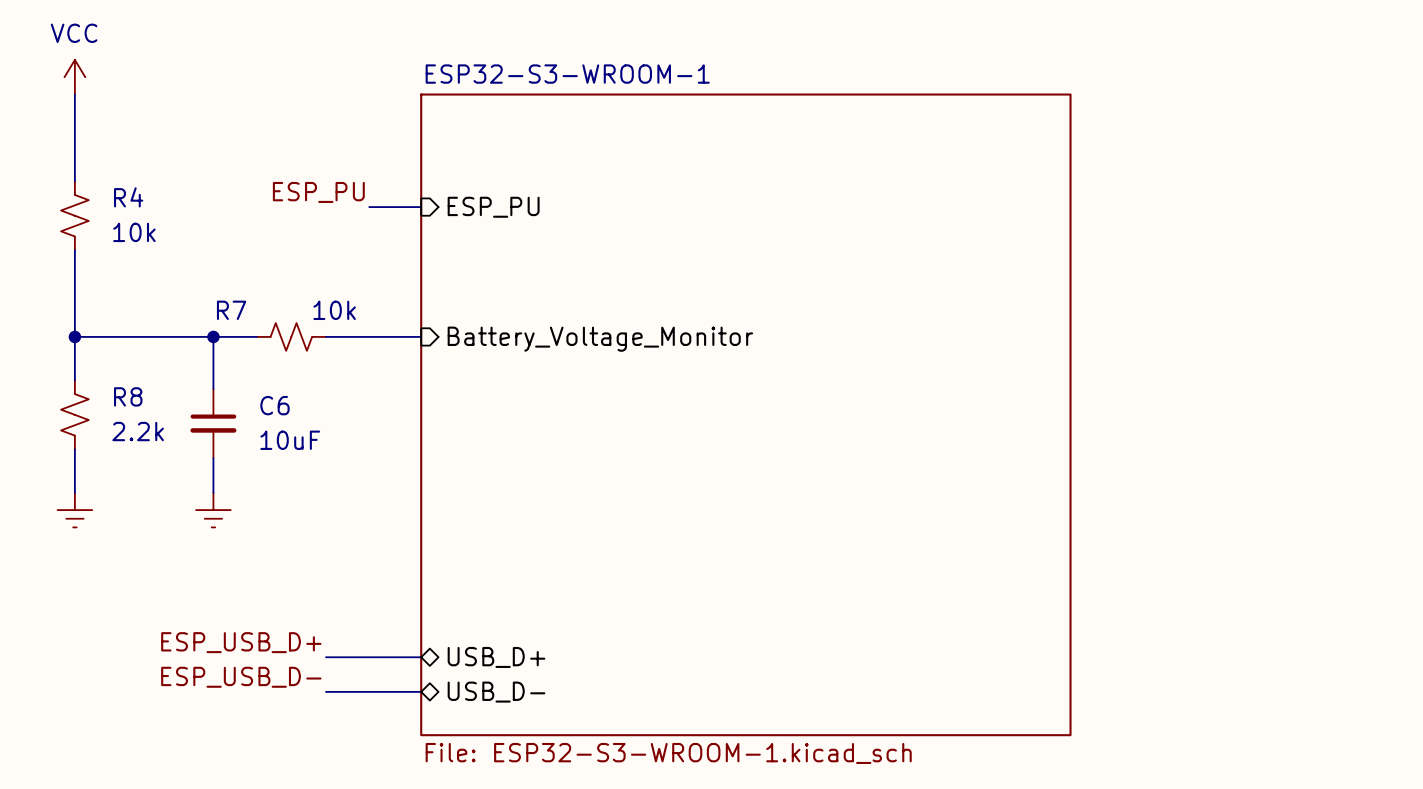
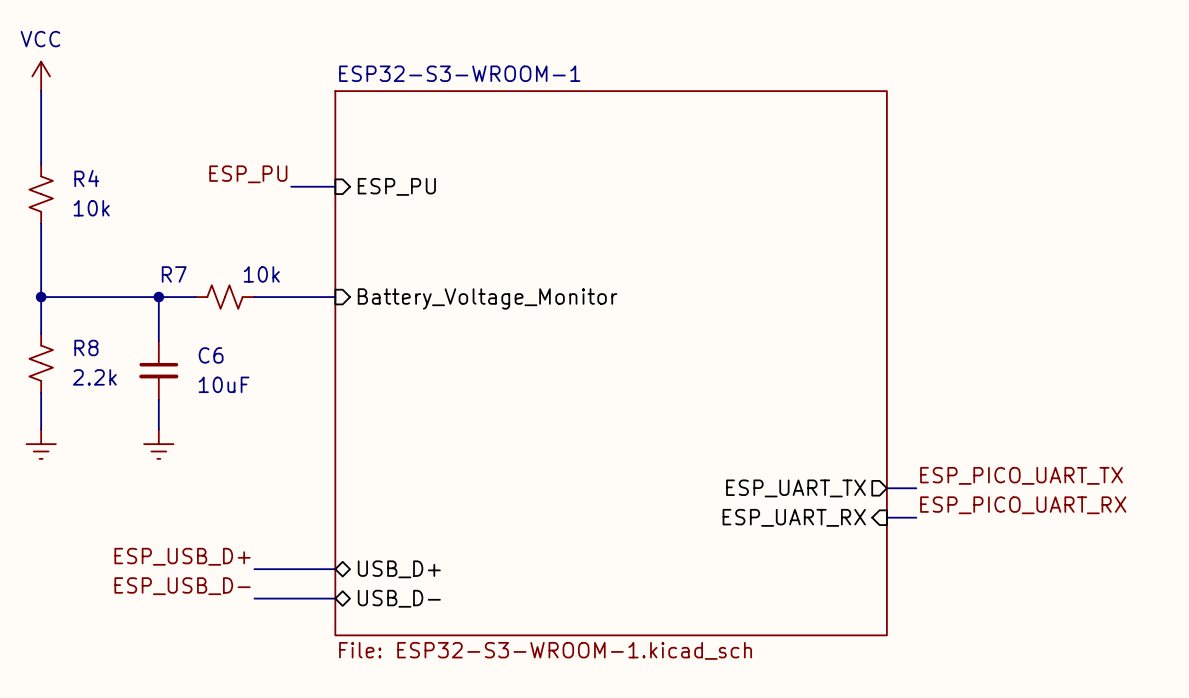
label: none -> ESP_PICO_UART_TX (1021, 475)
sheet pin: none -> ESP_UART_TX (795, 488)
wire: none -> (886, 488) (916, 488)
label: none -> ESP_PICO_UART_RX (1023, 505)
sheet pin: none -> ESP_UART_RX (794, 517)
wire: none -> (886, 517) (916, 517)

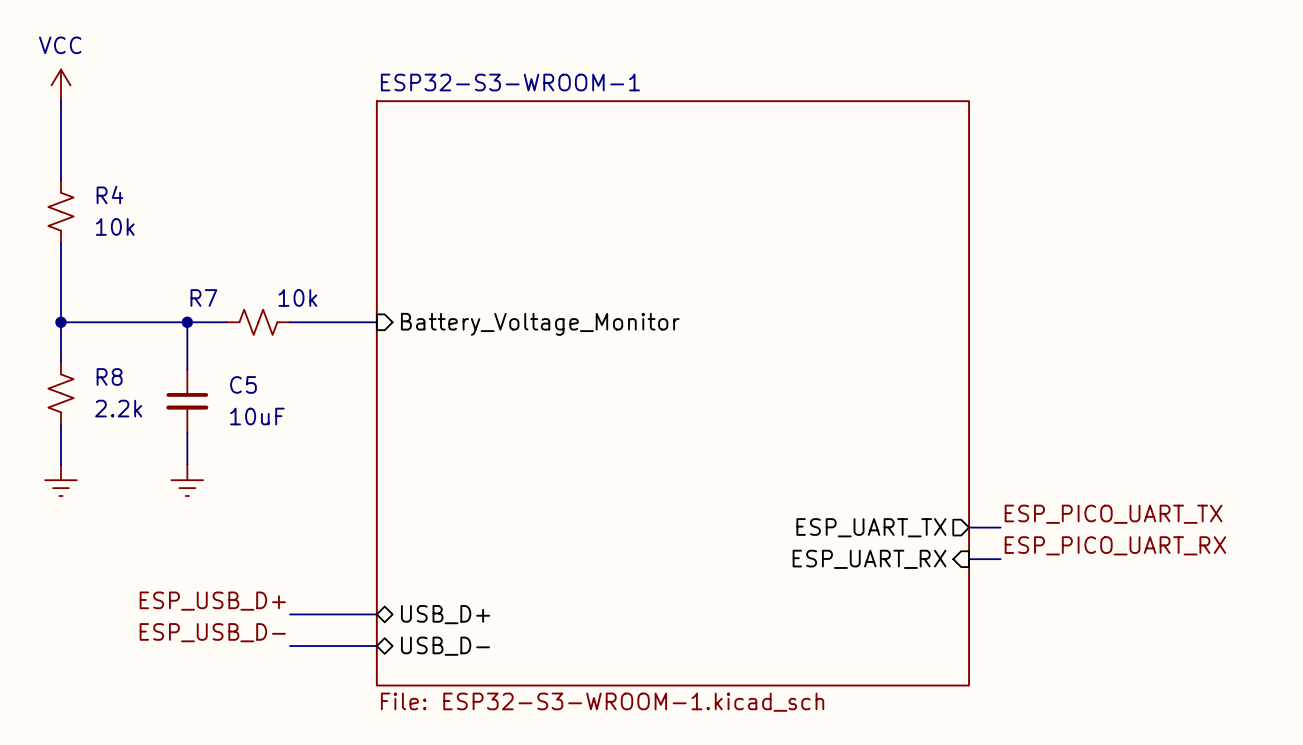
label: ESP_PU (248, 174) -> none
wire: (291, 186) (335, 186) -> none
sheet pin: ESP_PU (396, 186) -> none
C6 name: C6 (211, 355) -> C5 (243, 384)

